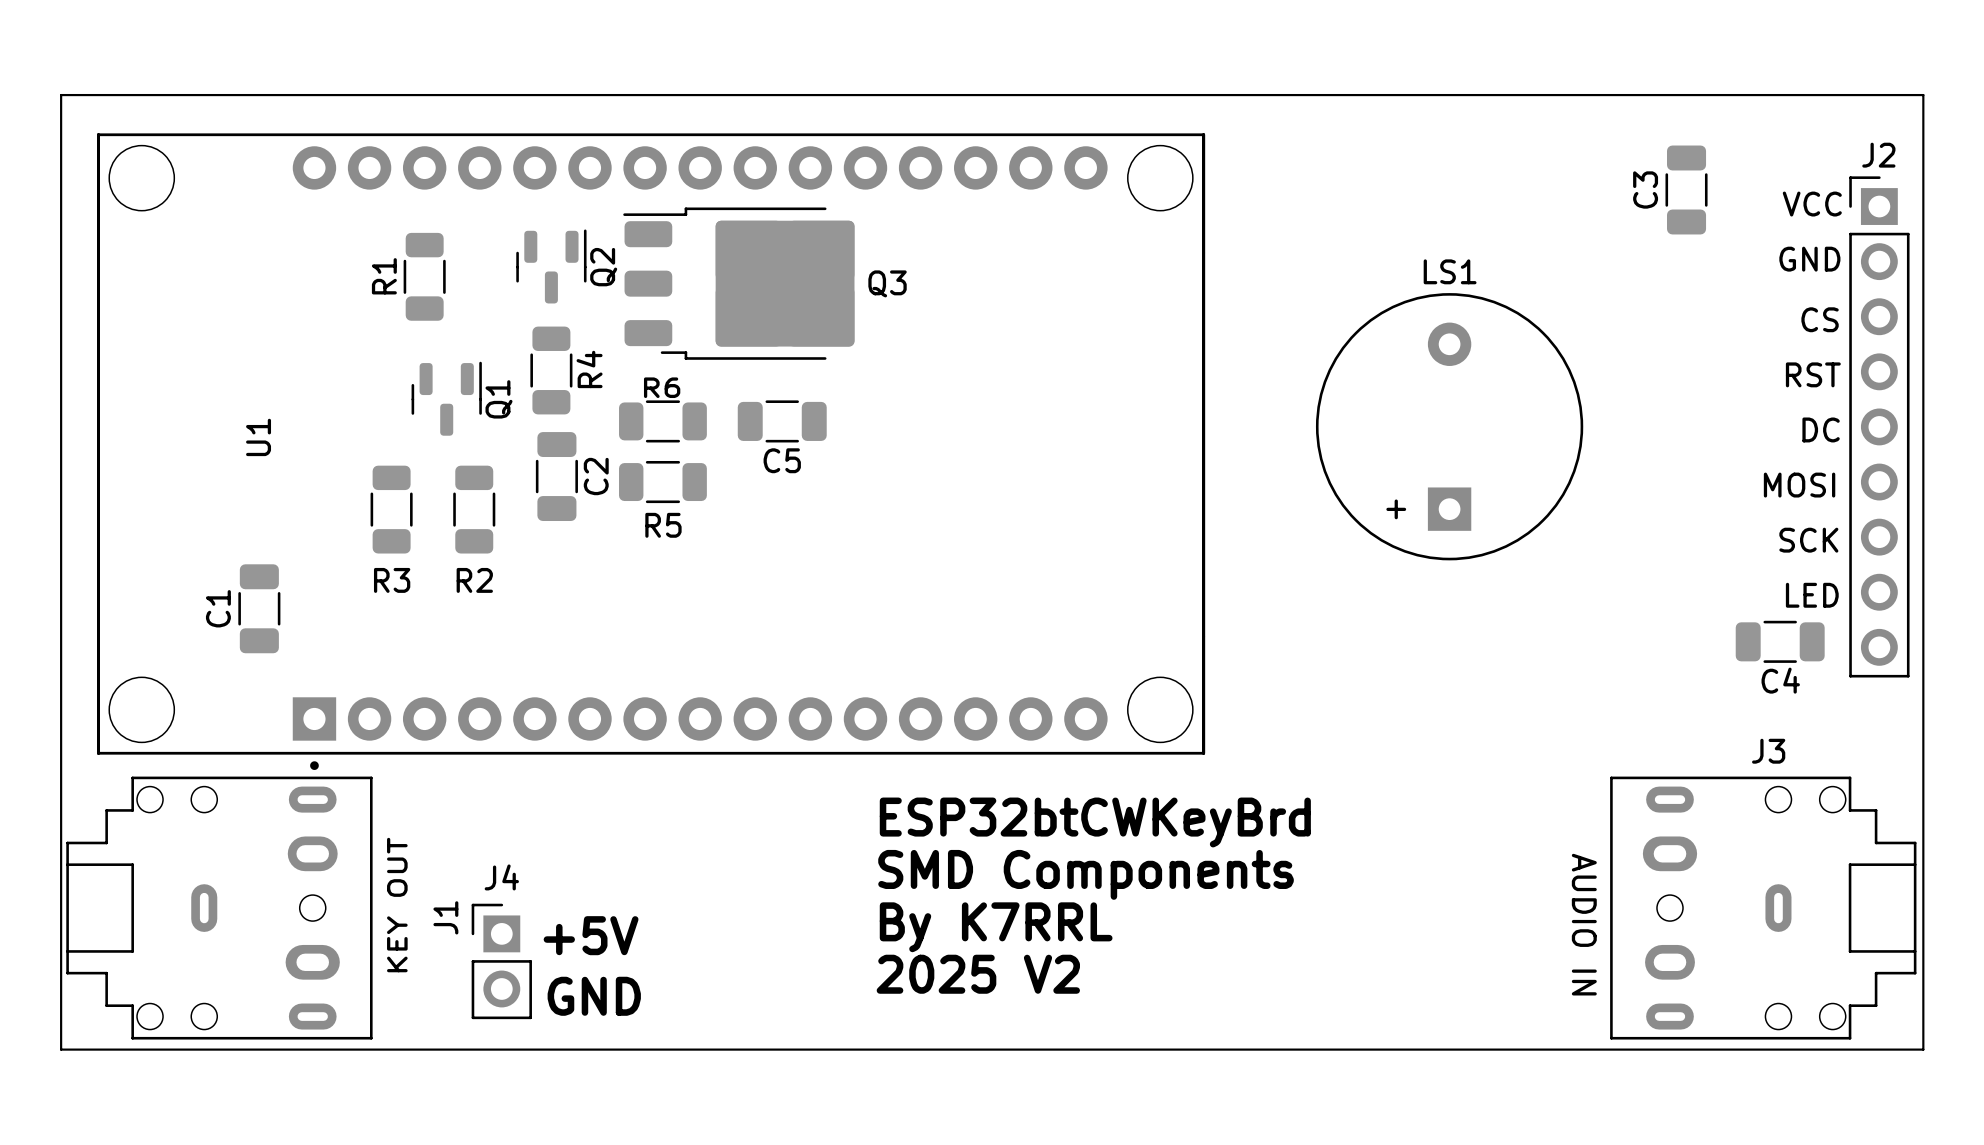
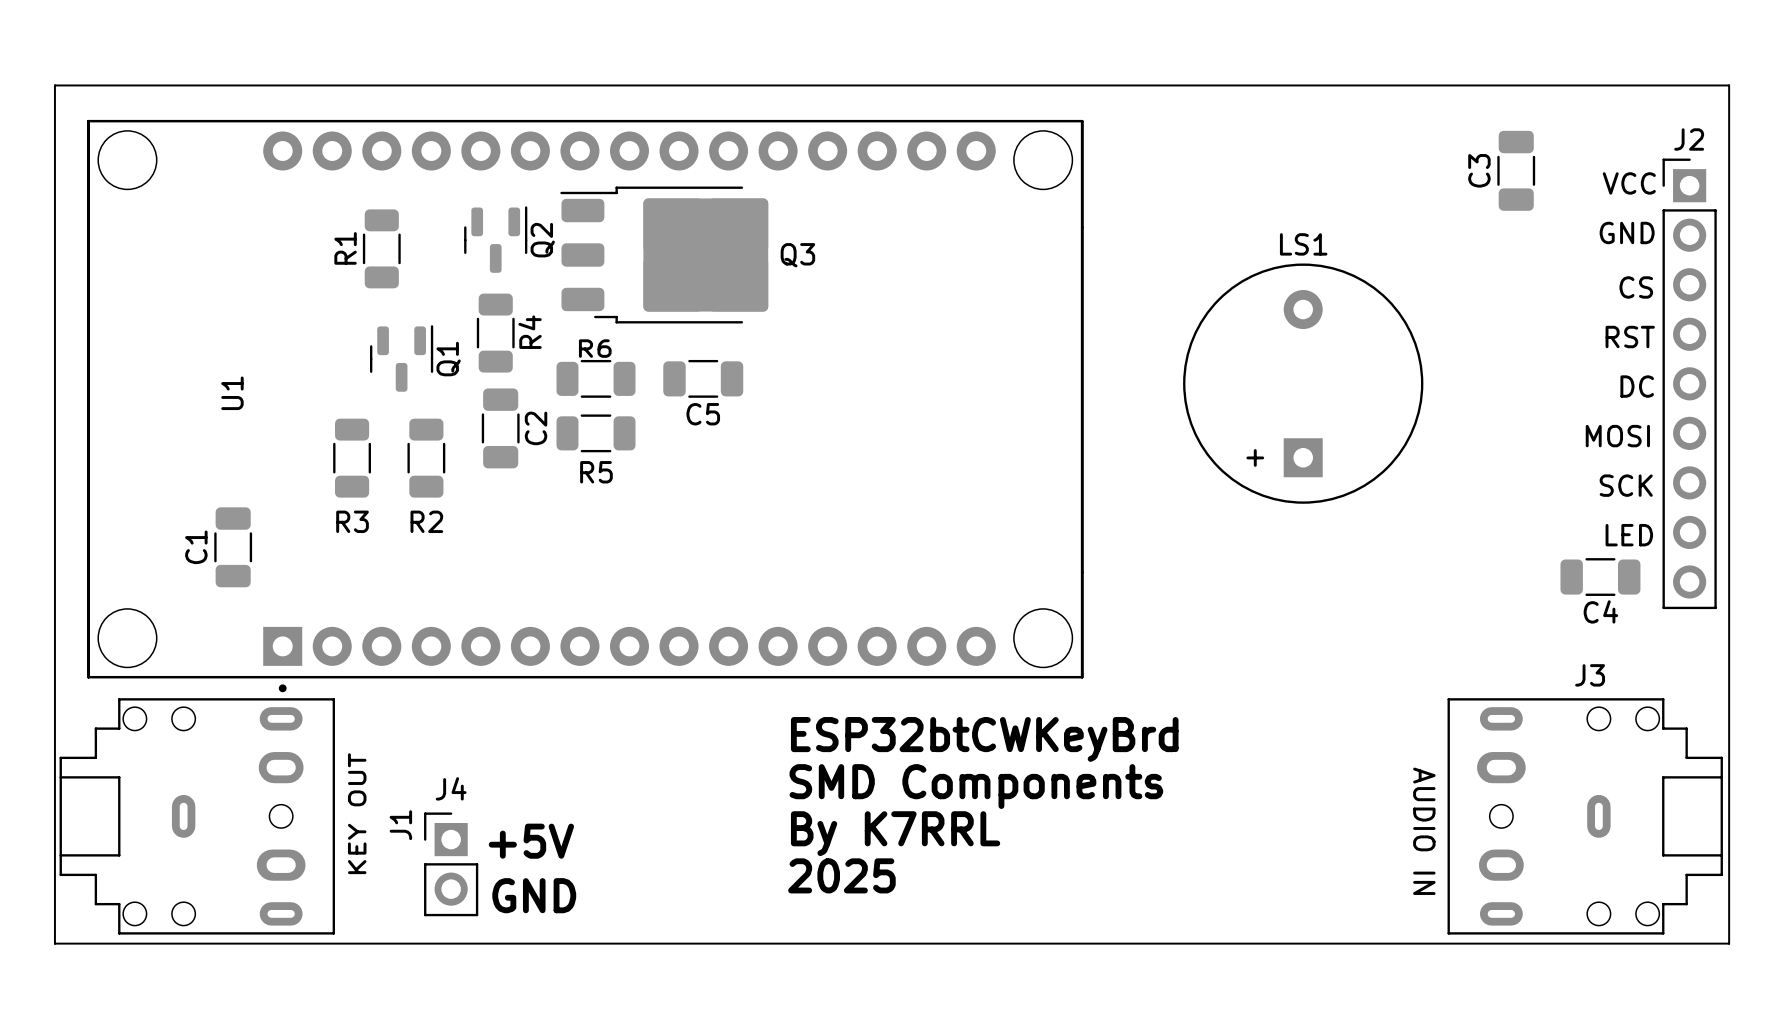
text: 2025 V2 (978, 974) -> 2025 (841, 875)

